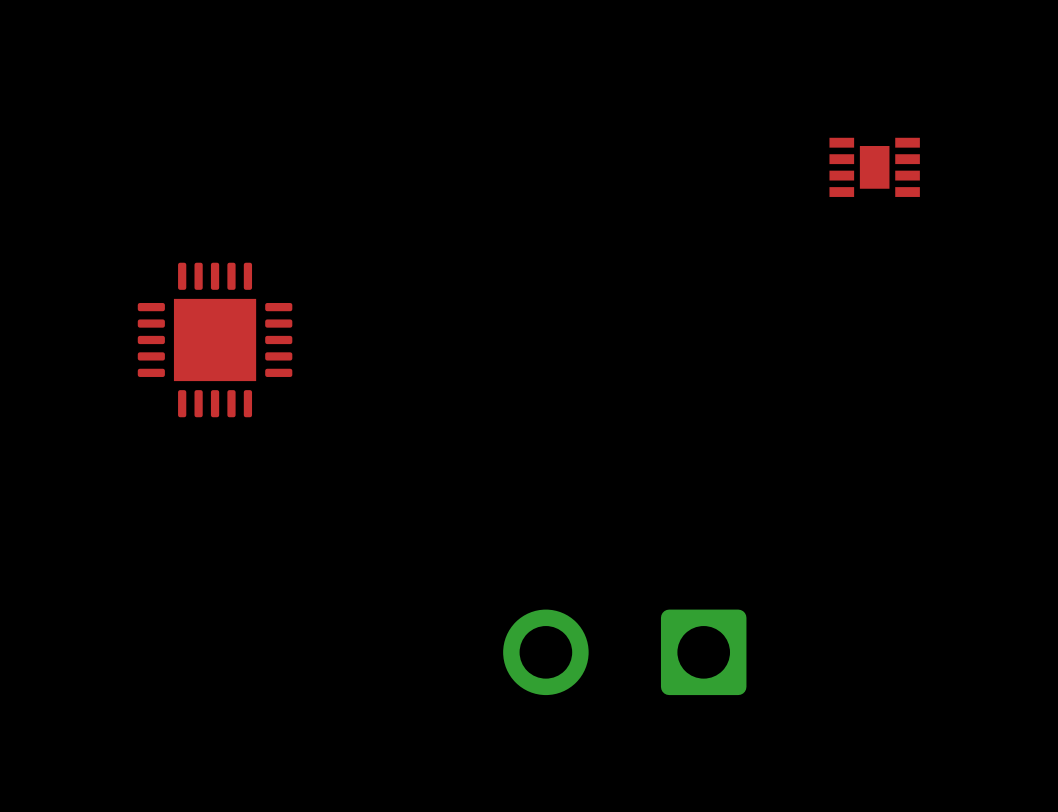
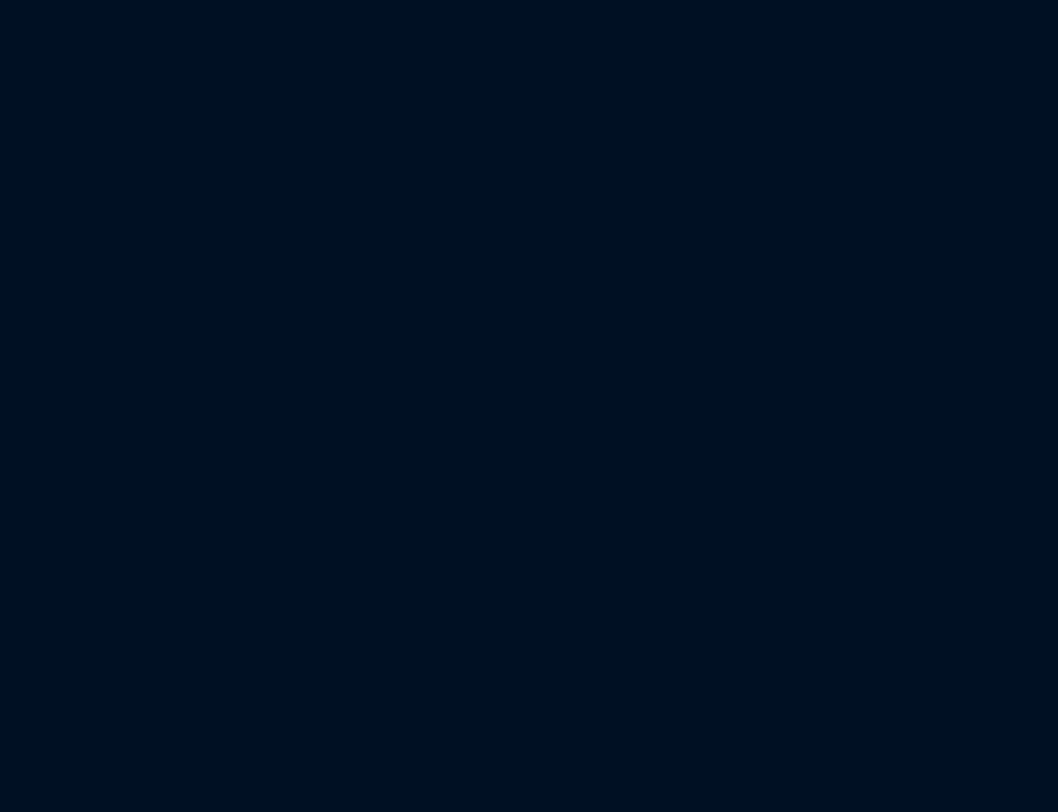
part: (874, 167) -> none
part: (215, 339) -> none
part: (624, 652) -> none

